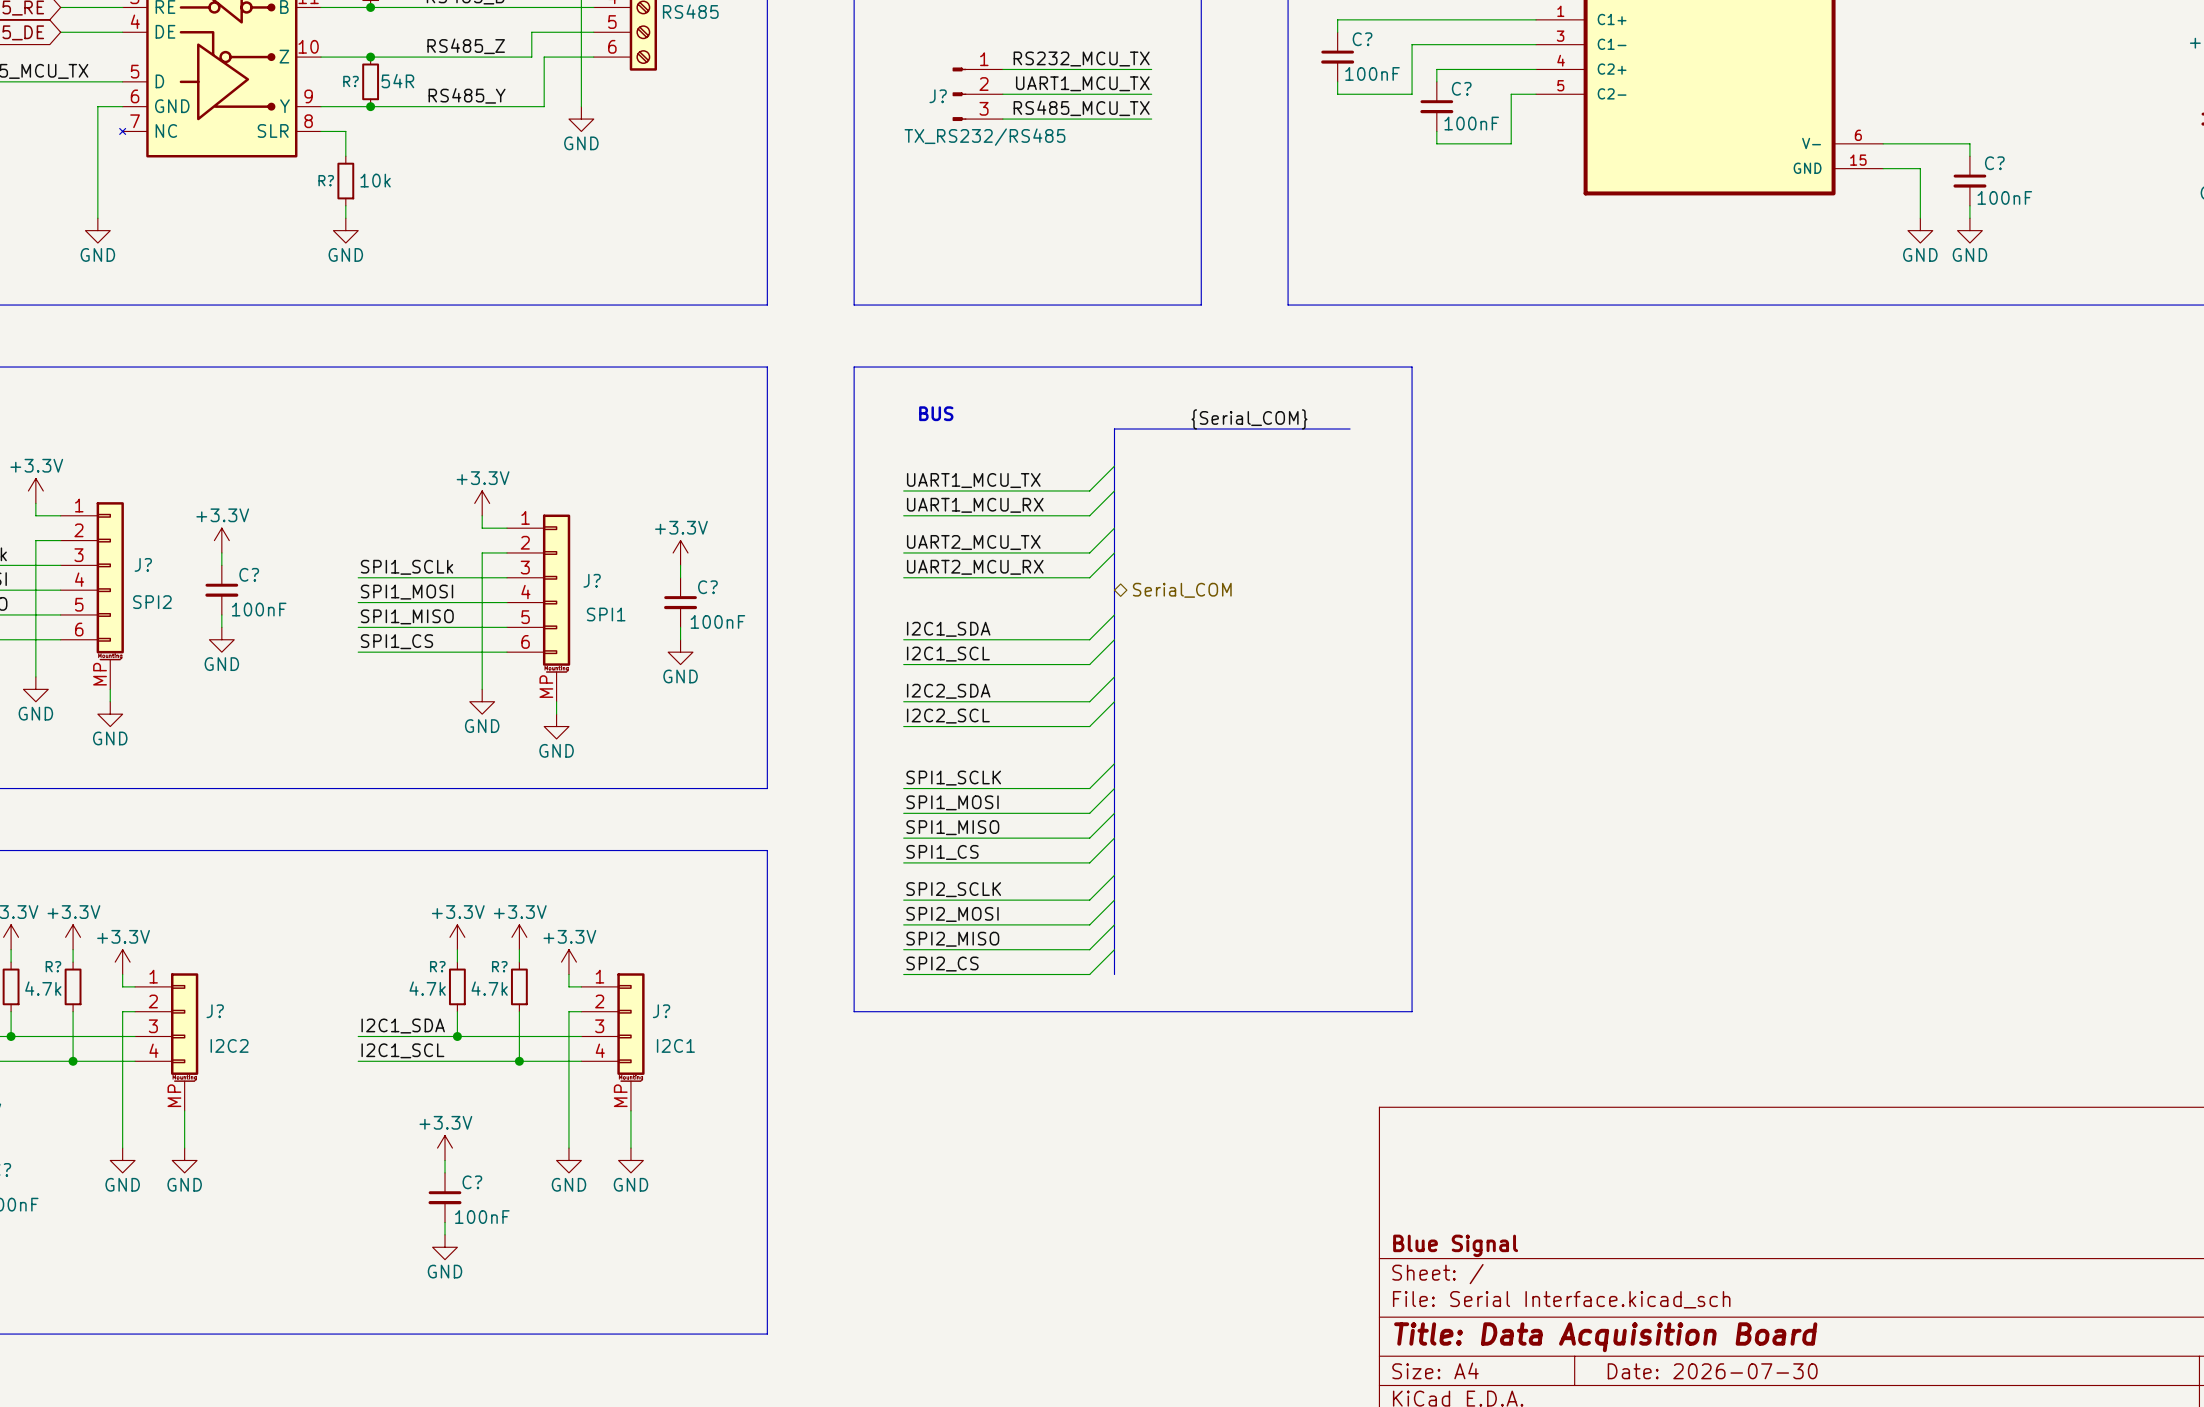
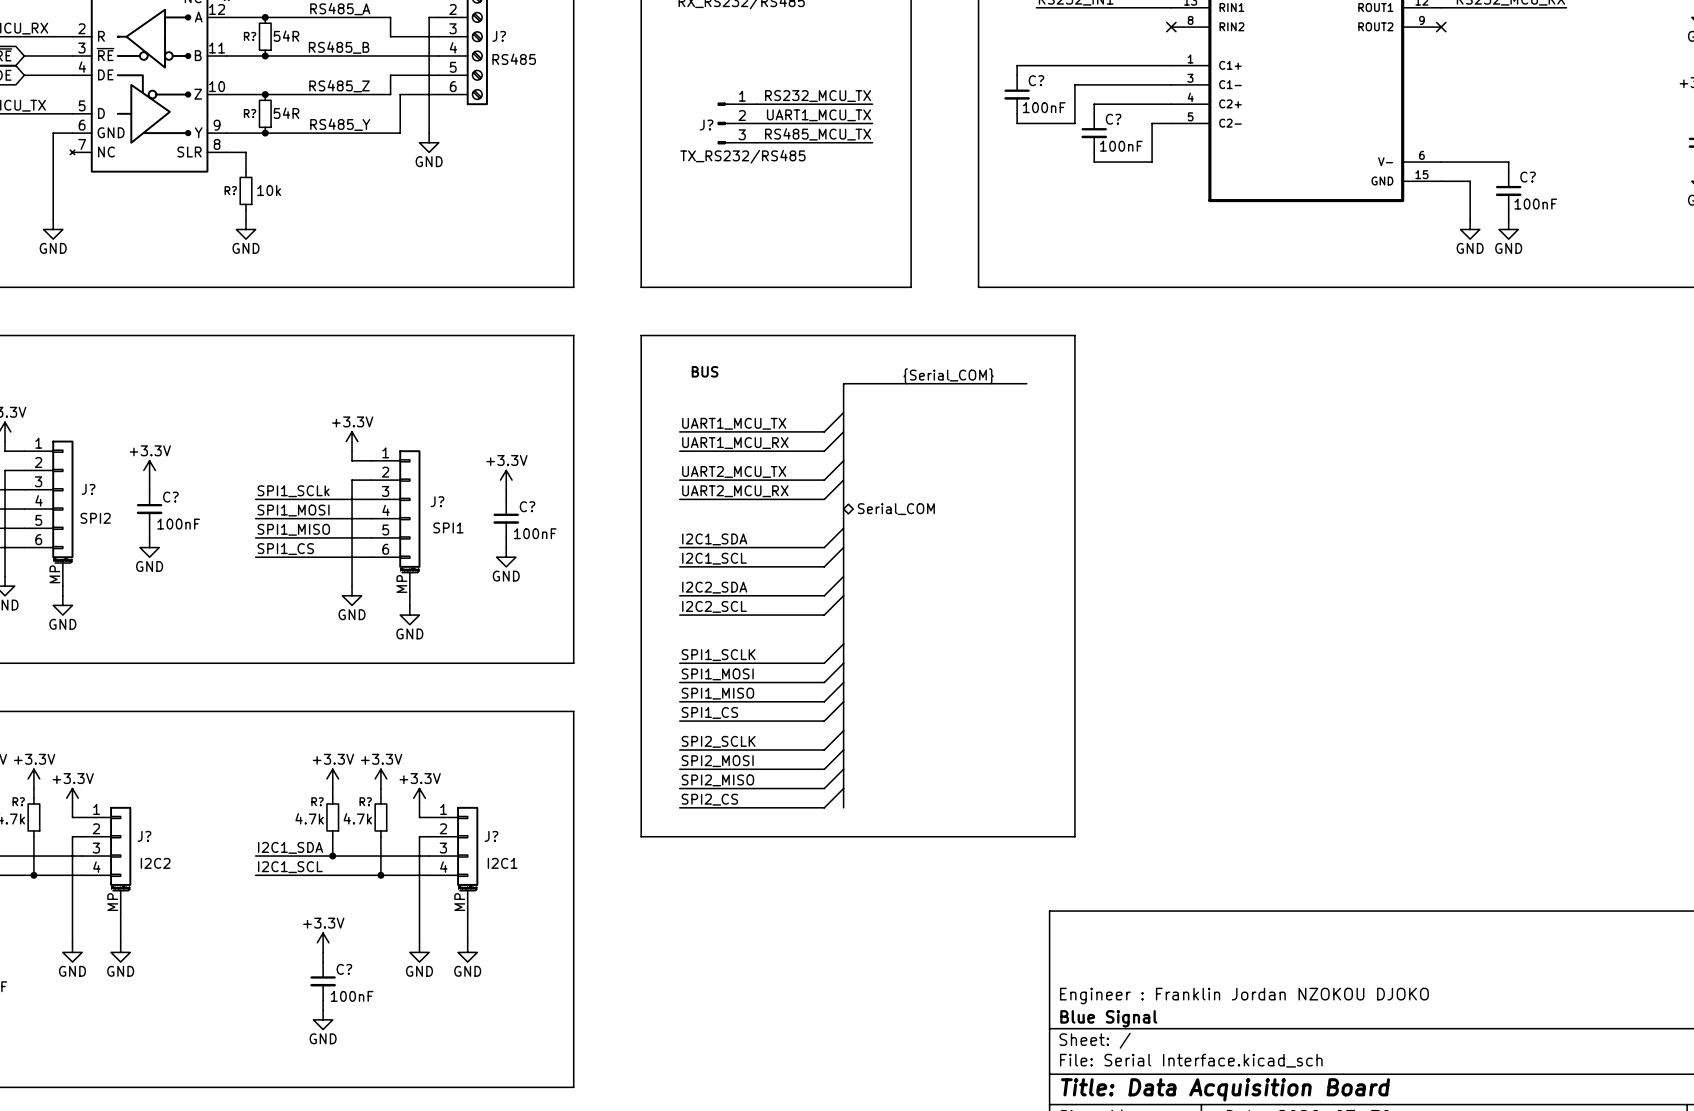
title block: none -> Engineer : Franklin Jordan NZOKOU DJOKO (1244, 996)

